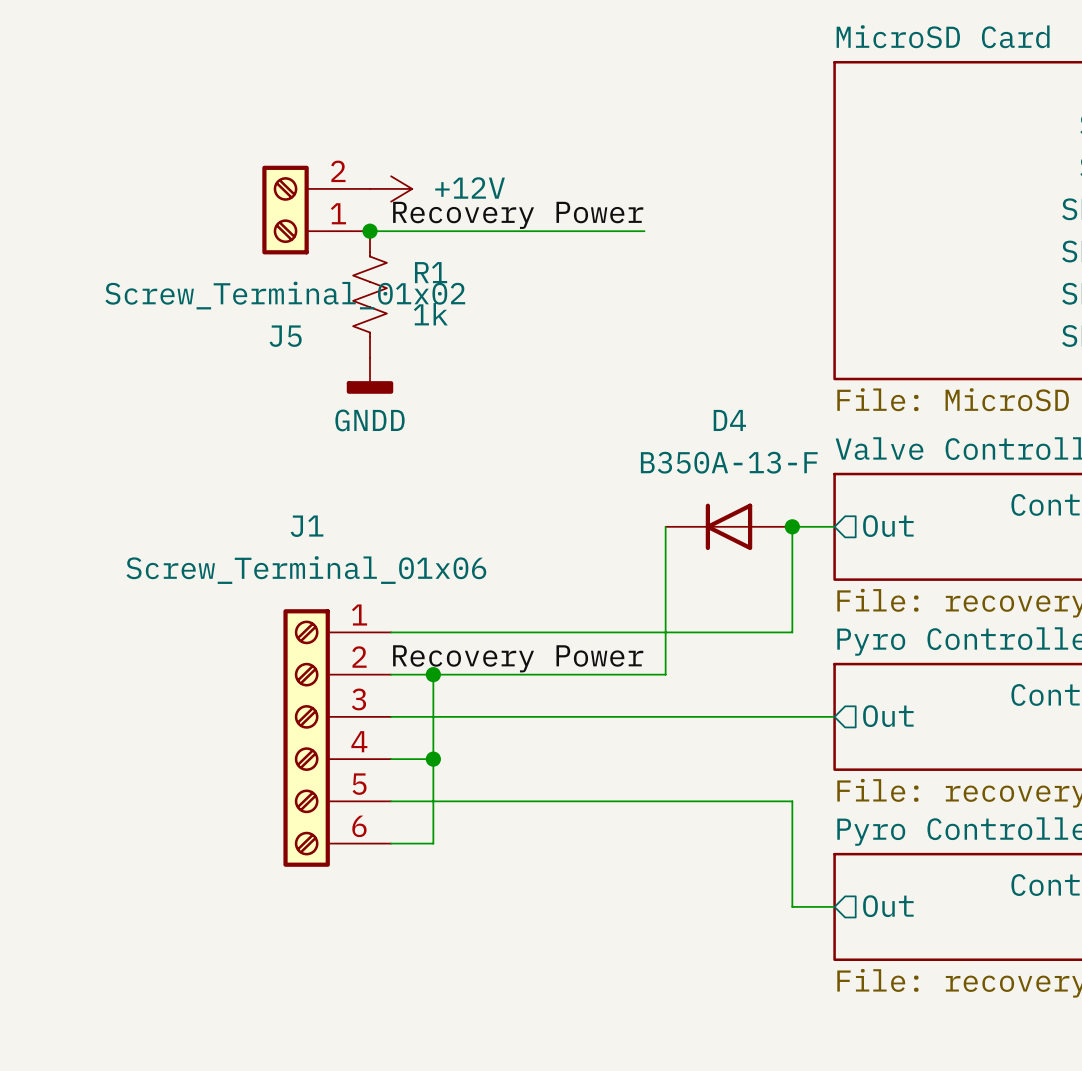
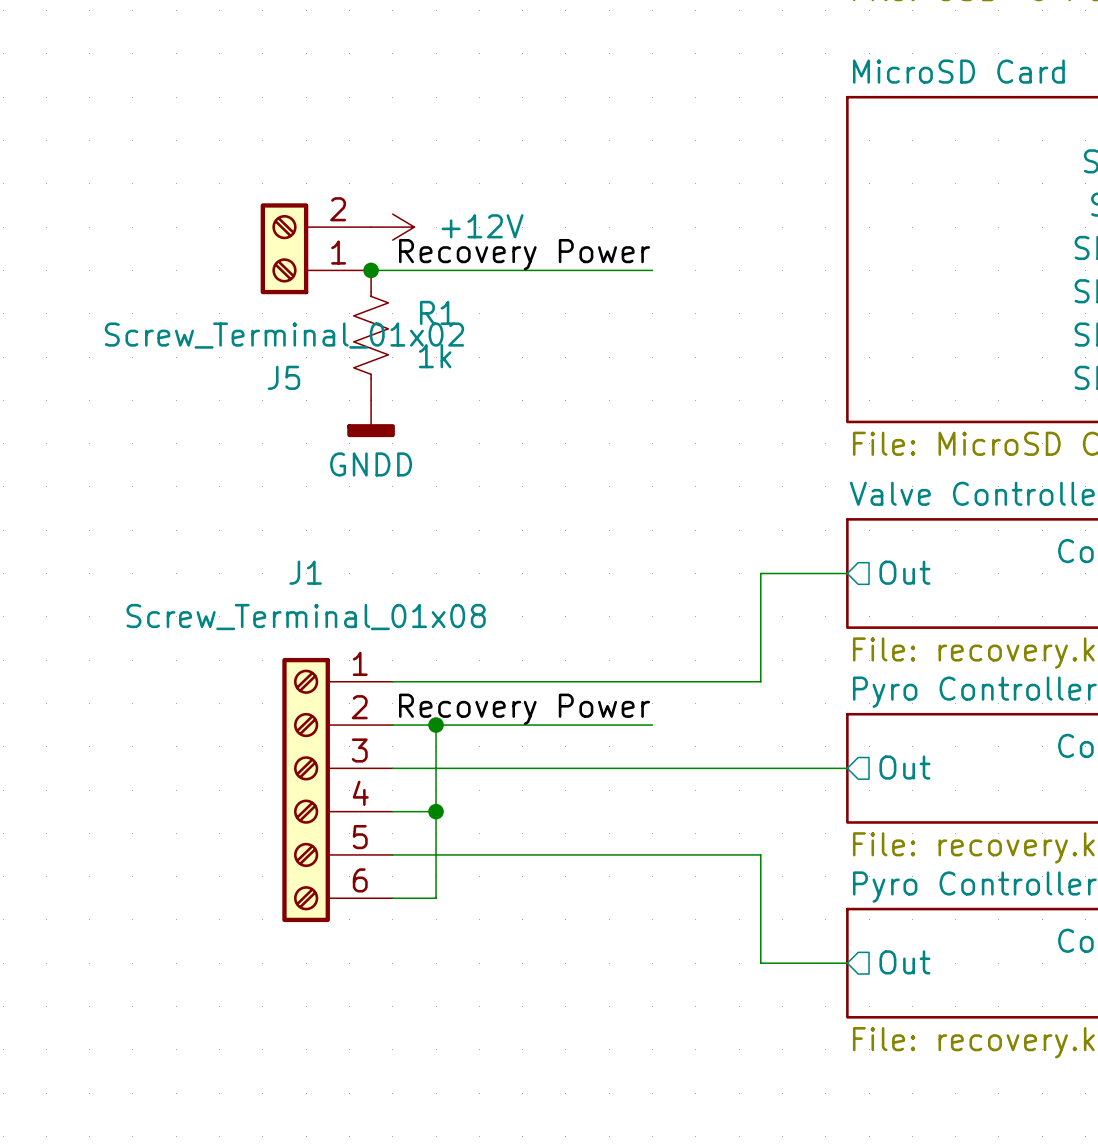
wire: (665, 526) (665, 674) (644, 674) -> none
D4: B350A-13-F (728, 526) -> none
wire: (792, 526) (792, 632) (750, 632) -> (804, 573) (760, 573) (760, 681)
junction: (792, 526) -> none
J1 value: Screw_Terminal_01x06 (306, 570) -> Screw_Terminal_01x08 (306, 617)
wire: (750, 801) (792, 801) (792, 906) -> (760, 854) (760, 963) (804, 963)

